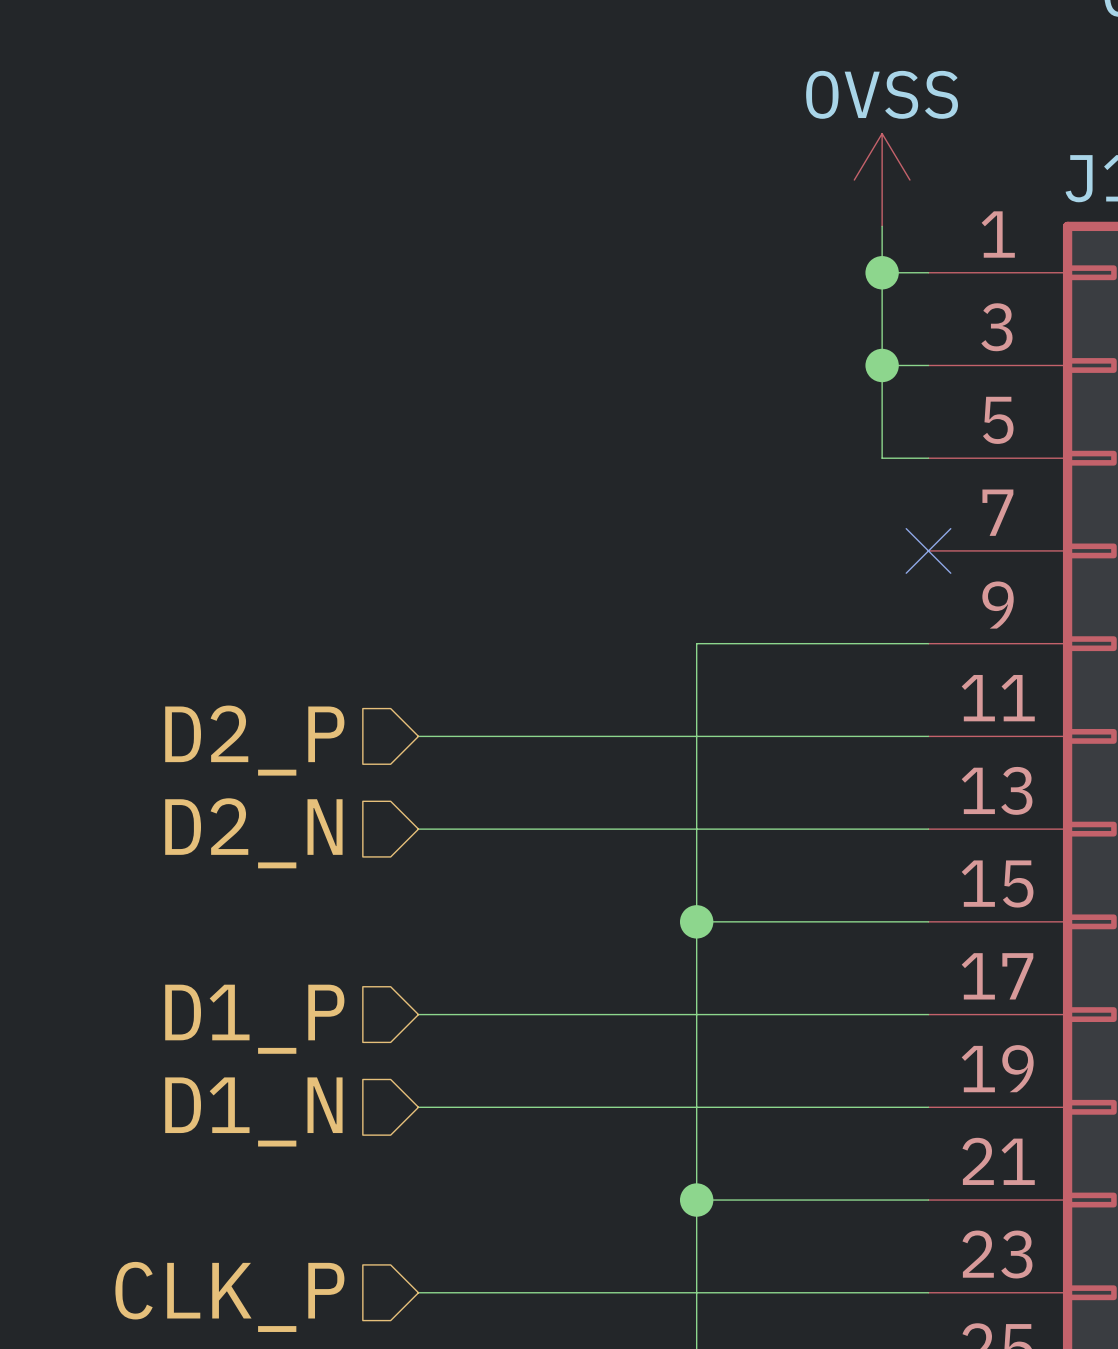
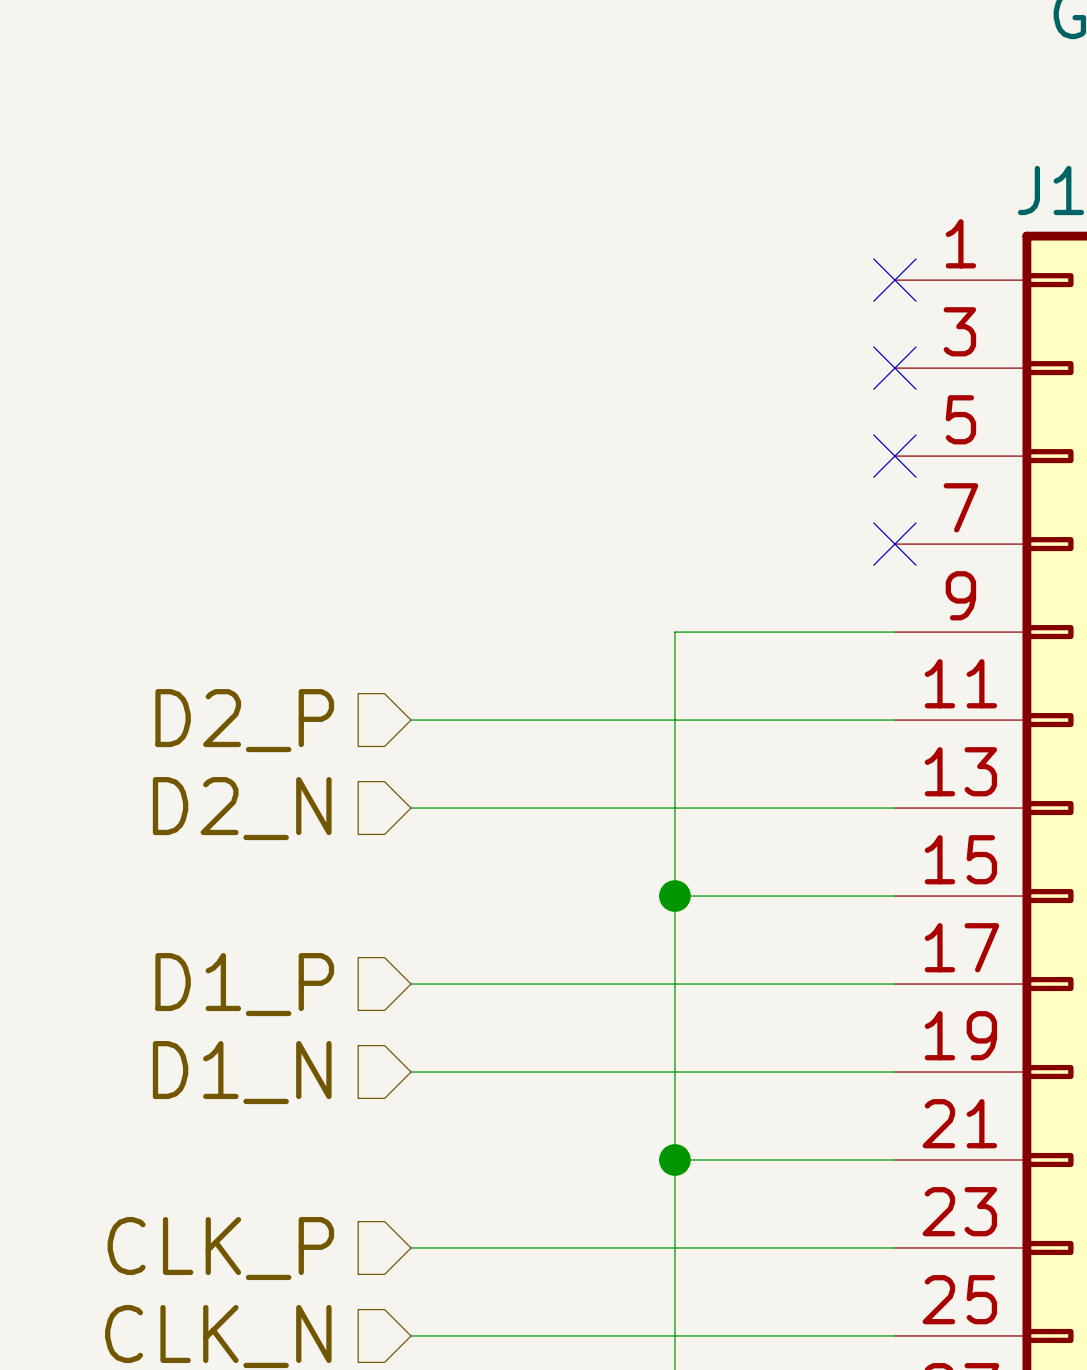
power symbol: OVSS (882, 180) -> none
wire: (882, 226) (882, 458) (928, 458) -> none
wire: (882, 272) (928, 272) -> none
junction: (882, 272) -> none
no-connect mark: none -> (894, 280)
wire: (882, 365) (928, 365) -> none
junction: (882, 365) -> none
no-connect mark: none -> (894, 368)
no-connect mark: none -> (894, 456)

